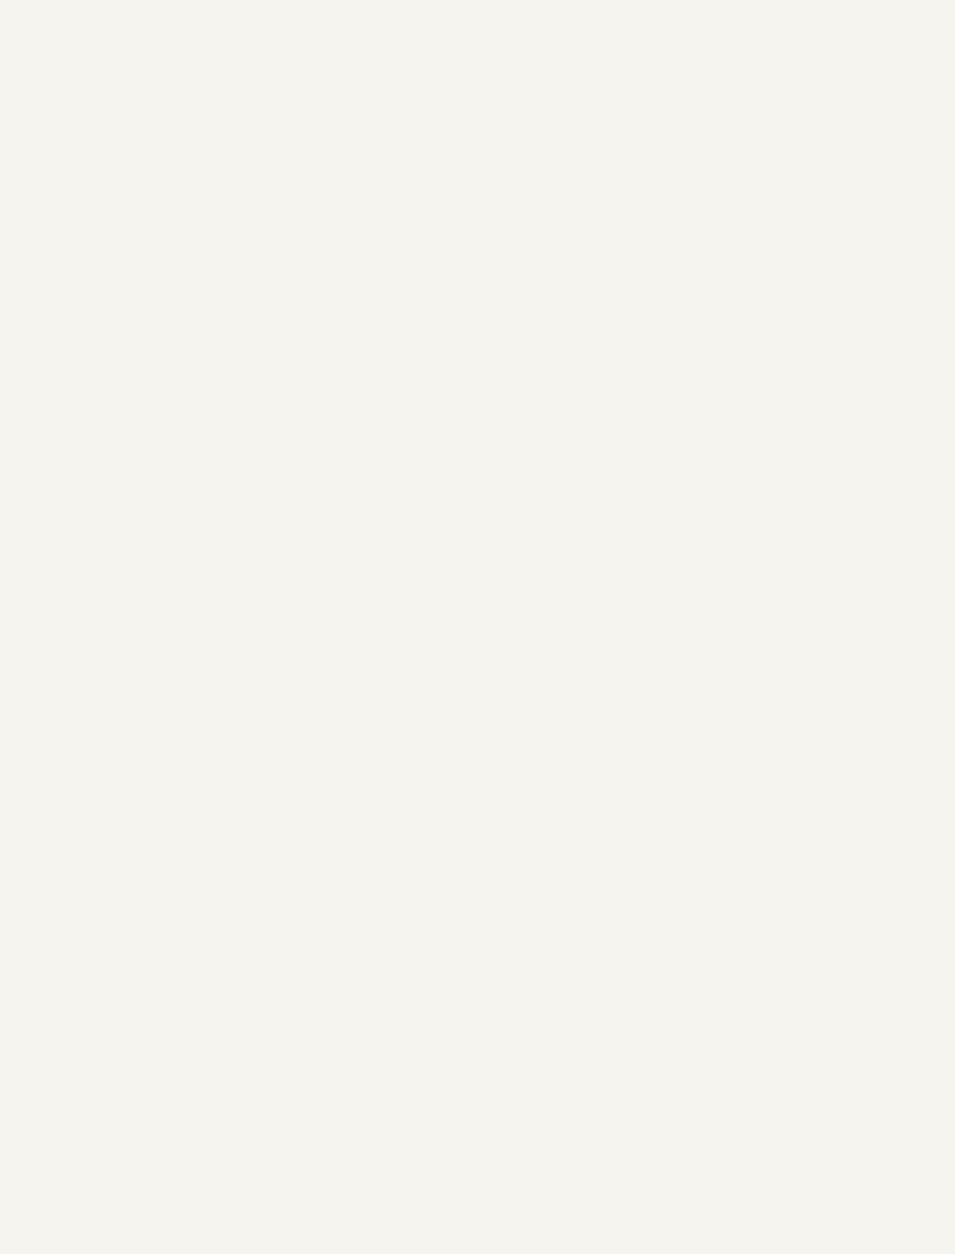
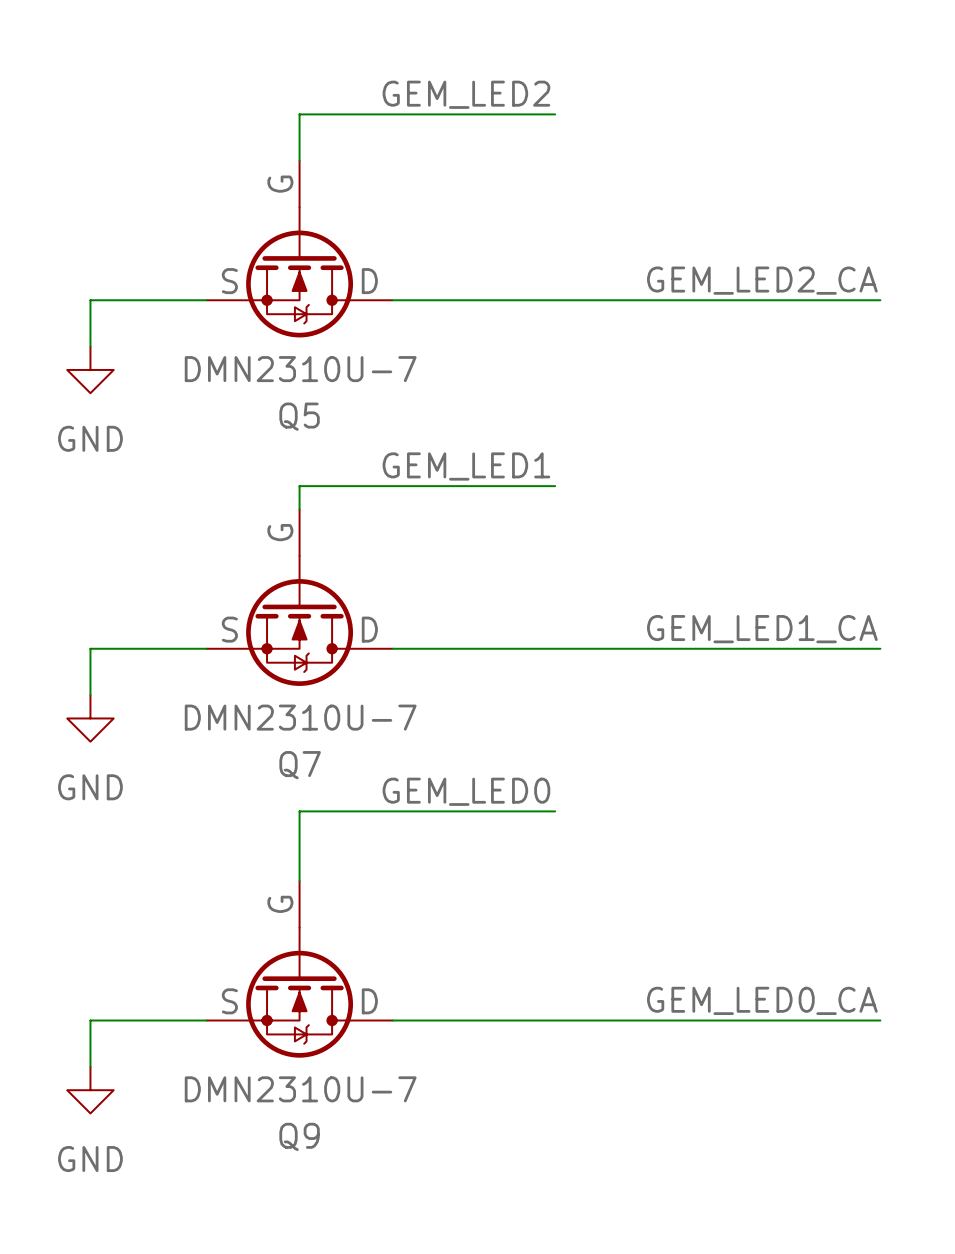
label: none -> GEM_LED2 (466, 94)
wire: none -> (555, 114) (299, 114) (299, 160)
Q5: none -> DMN2310U-7 (299, 249)
label: none -> GEM_LED2_CA (762, 280)
wire: none -> (206, 300) (90, 300) (90, 346)
wire: none -> (392, 300) (880, 300)
power symbol: none -> GND (90, 369)
label: none -> GEM_LED1 (466, 466)
wire: none -> (555, 486) (299, 486) (299, 509)
Q7: none -> DMN2310U-7 (299, 597)
label: none -> GEM_LED1_CA (762, 629)
wire: none -> (206, 648) (90, 648) (90, 695)
wire: none -> (392, 648) (880, 648)
power symbol: none -> GND (90, 718)
label: none -> GEM_LED0 (466, 791)
wire: none -> (555, 811) (299, 811) (299, 881)
Q9: none -> DMN2310U-7 (299, 969)
label: none -> GEM_LED0_CA (762, 1000)
wire: none -> (206, 1020) (90, 1020) (90, 1066)
wire: none -> (392, 1020) (880, 1020)
power symbol: none -> GND (90, 1090)

